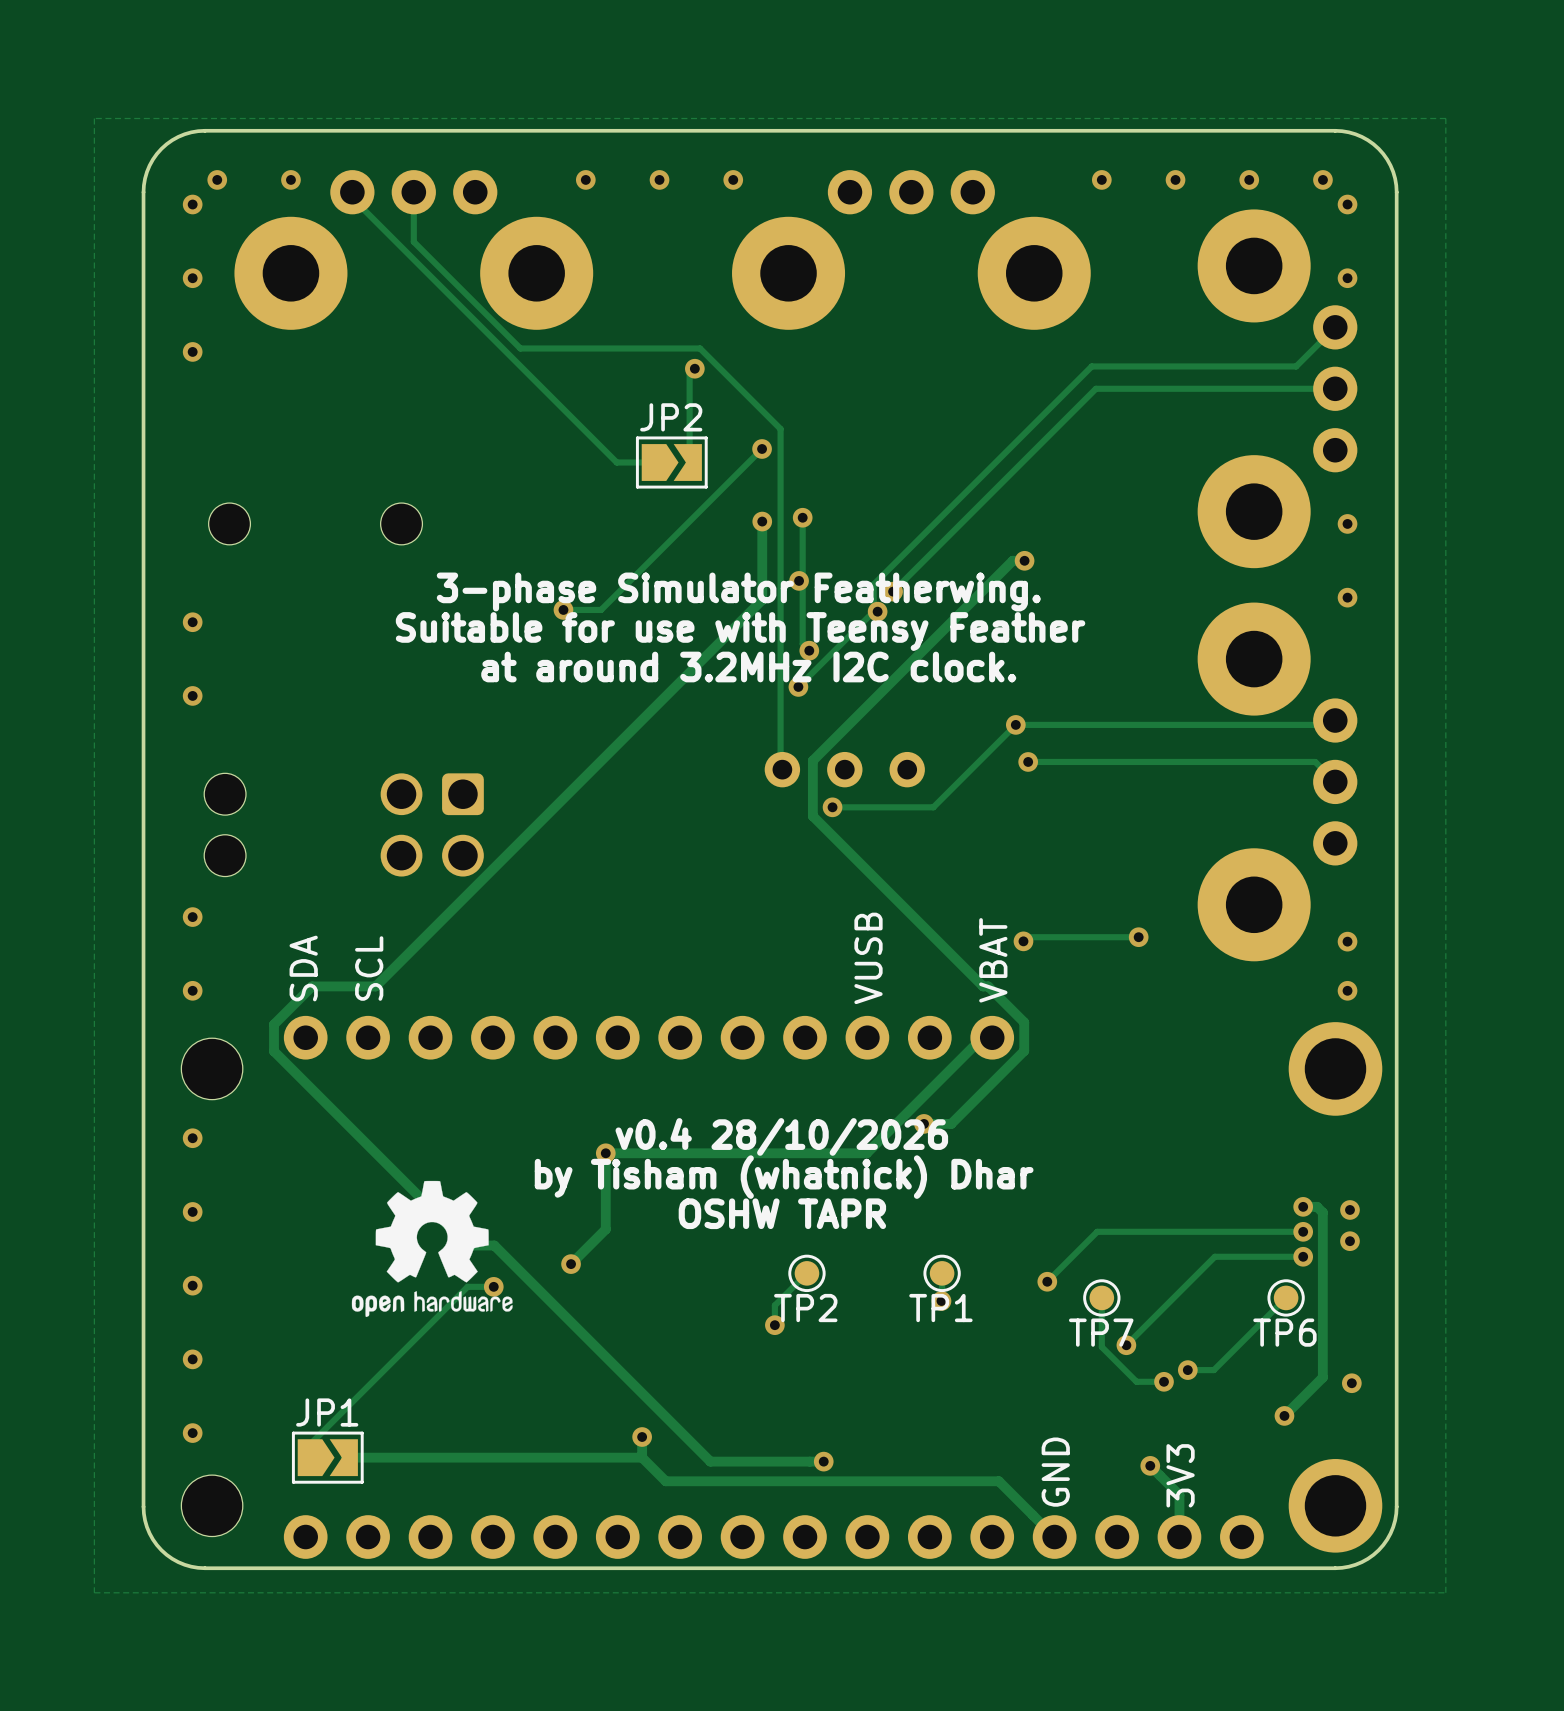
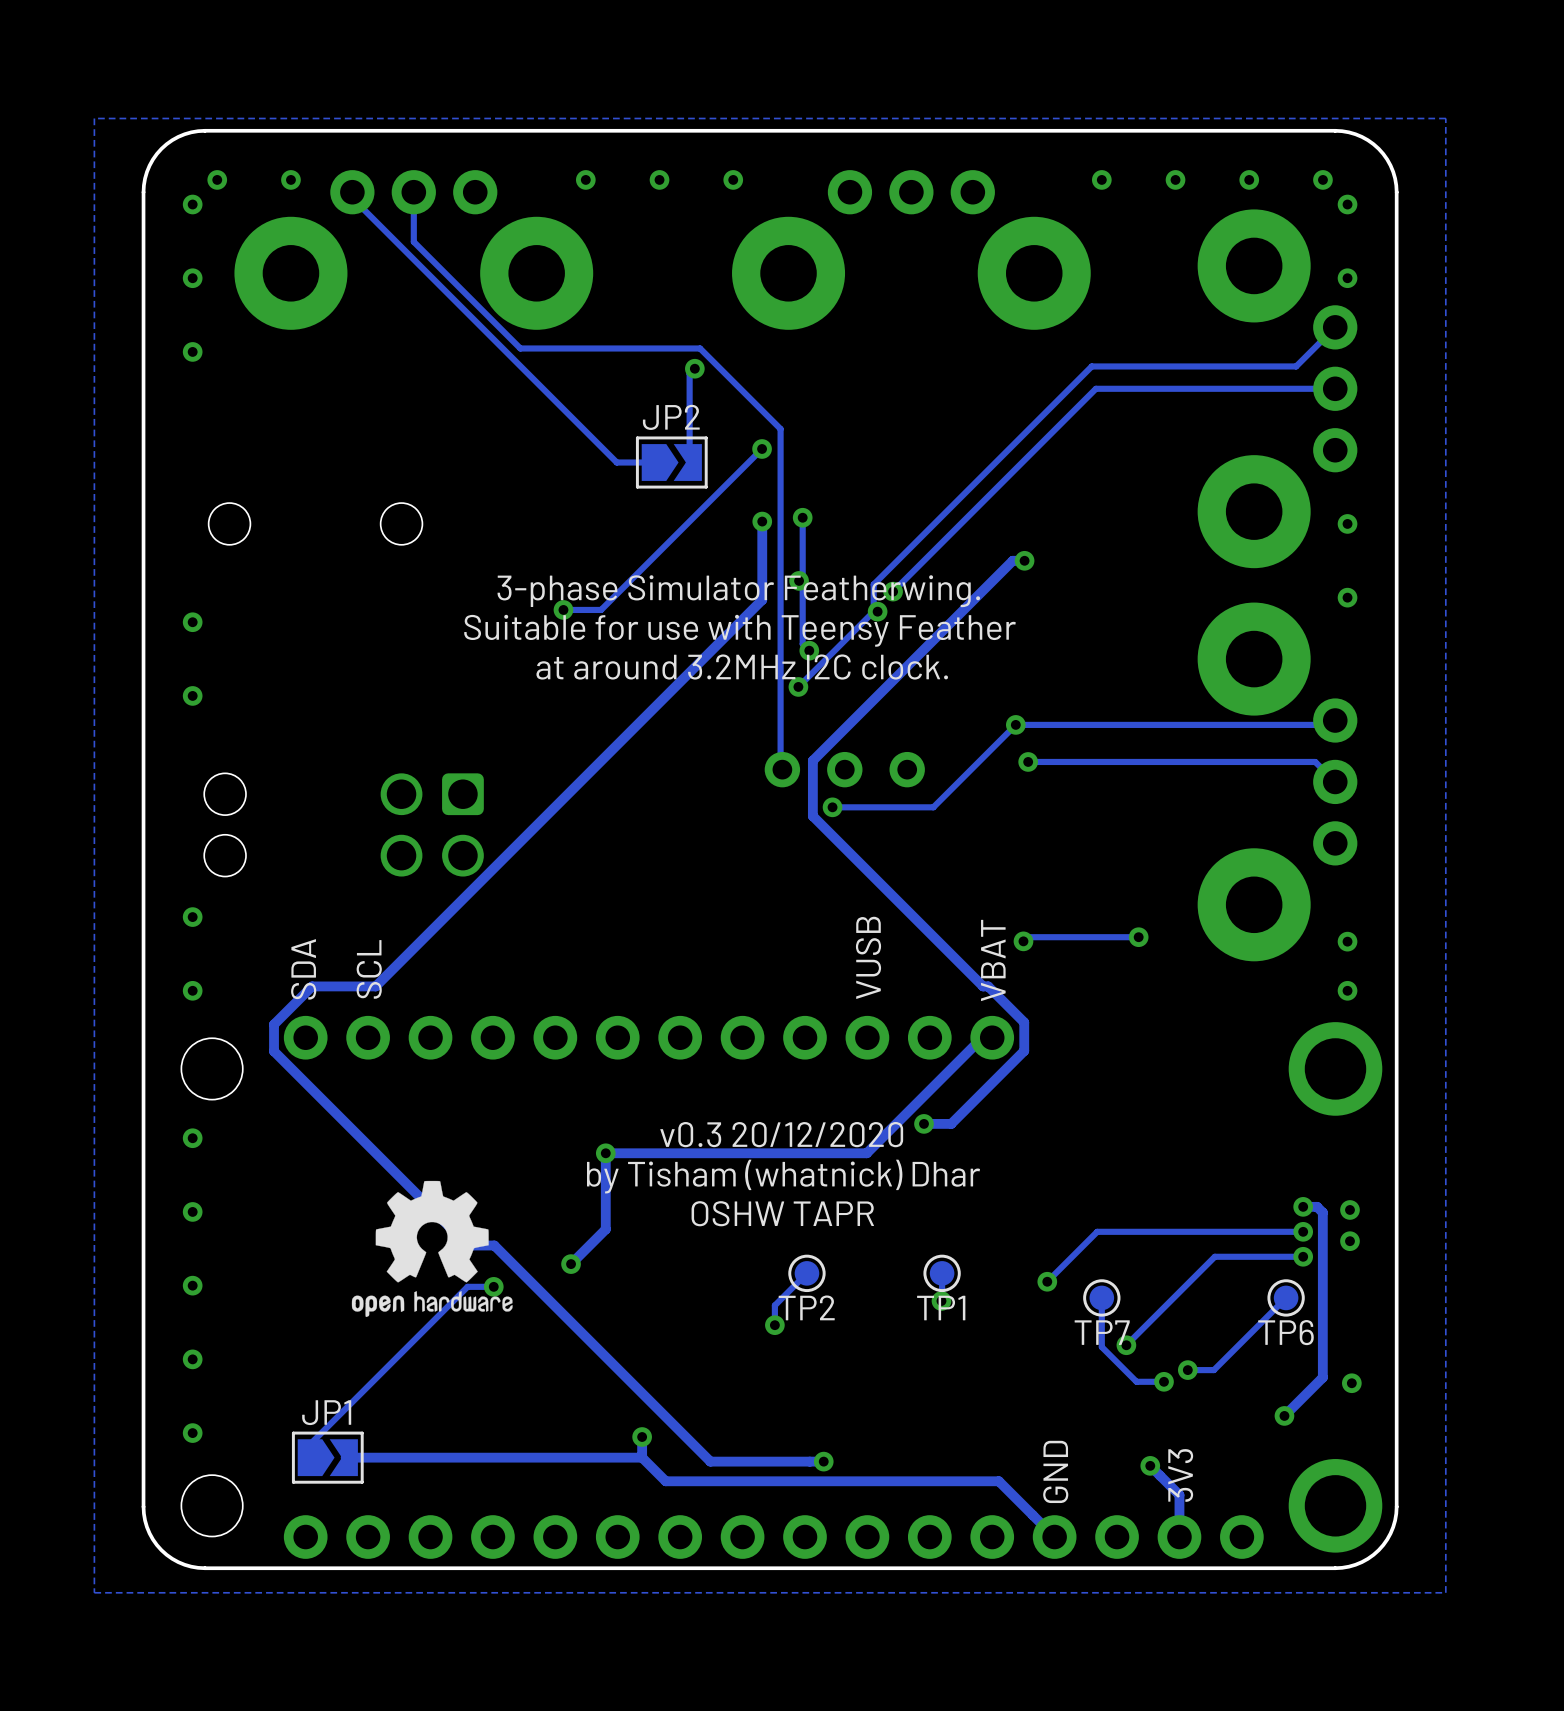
text: v0.4 28/10/2026 (781, 1136) -> v0.3 20/12/2020 (781, 1134)

